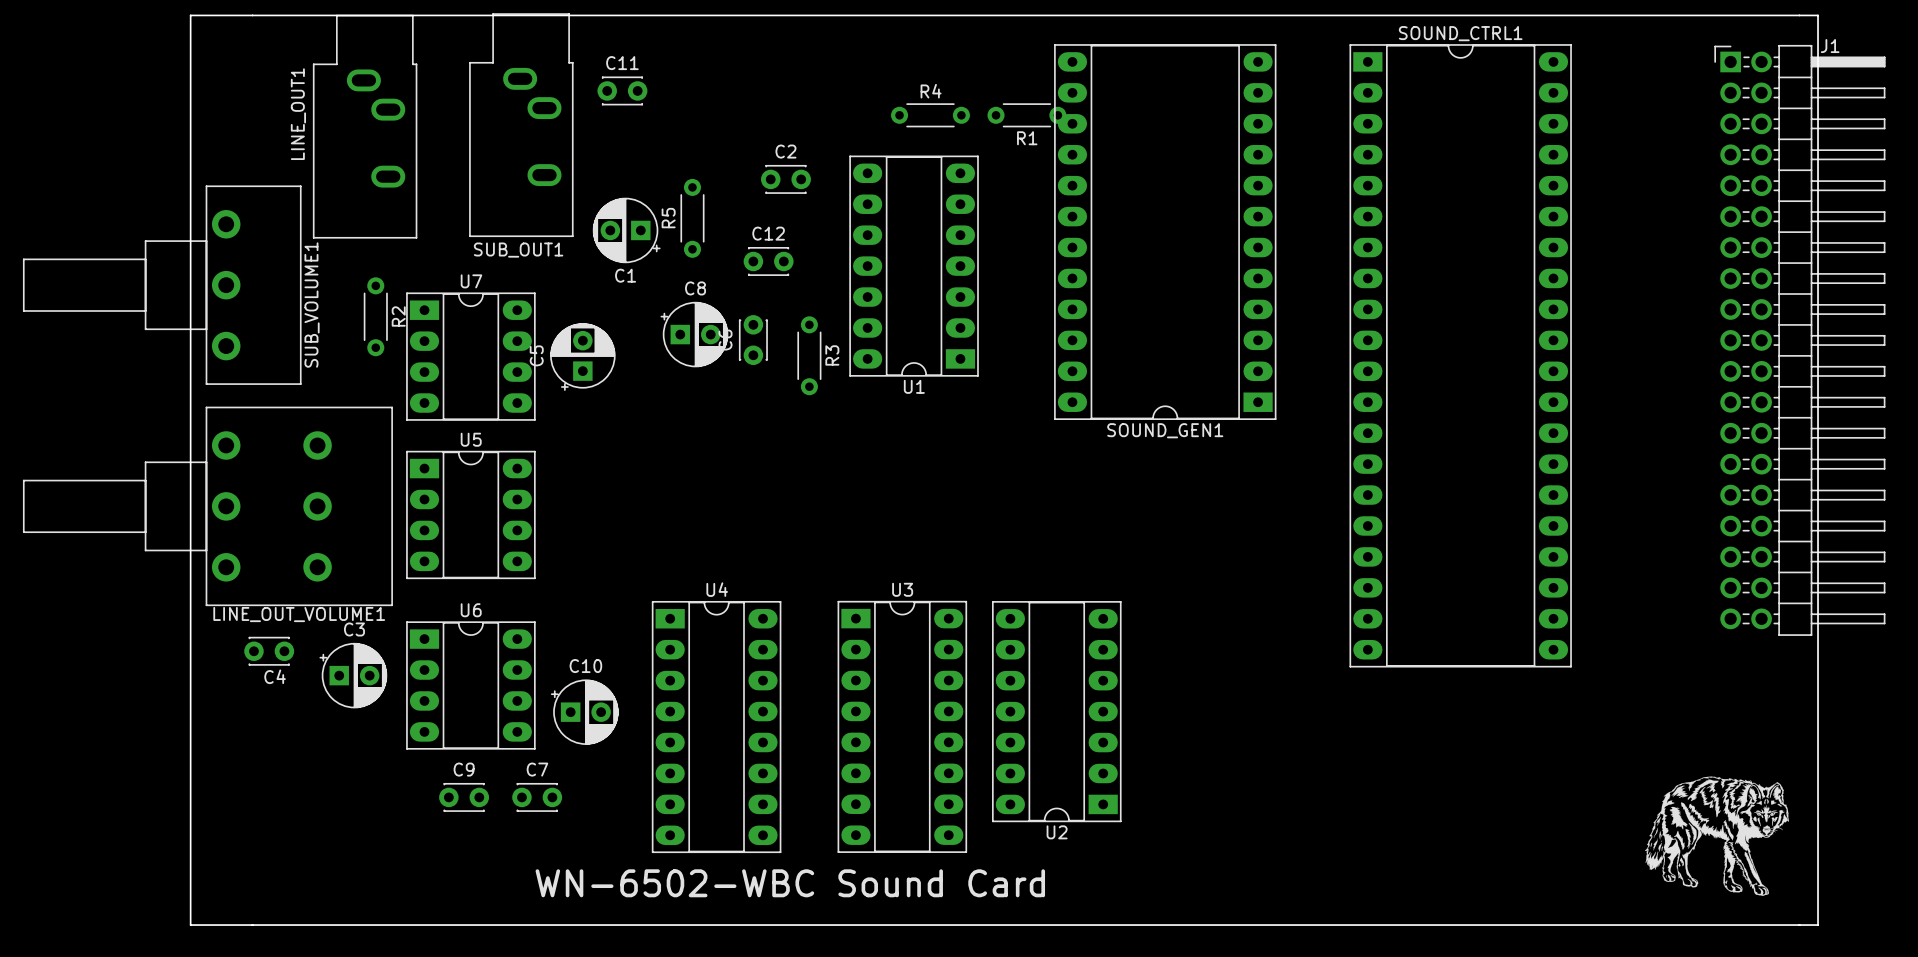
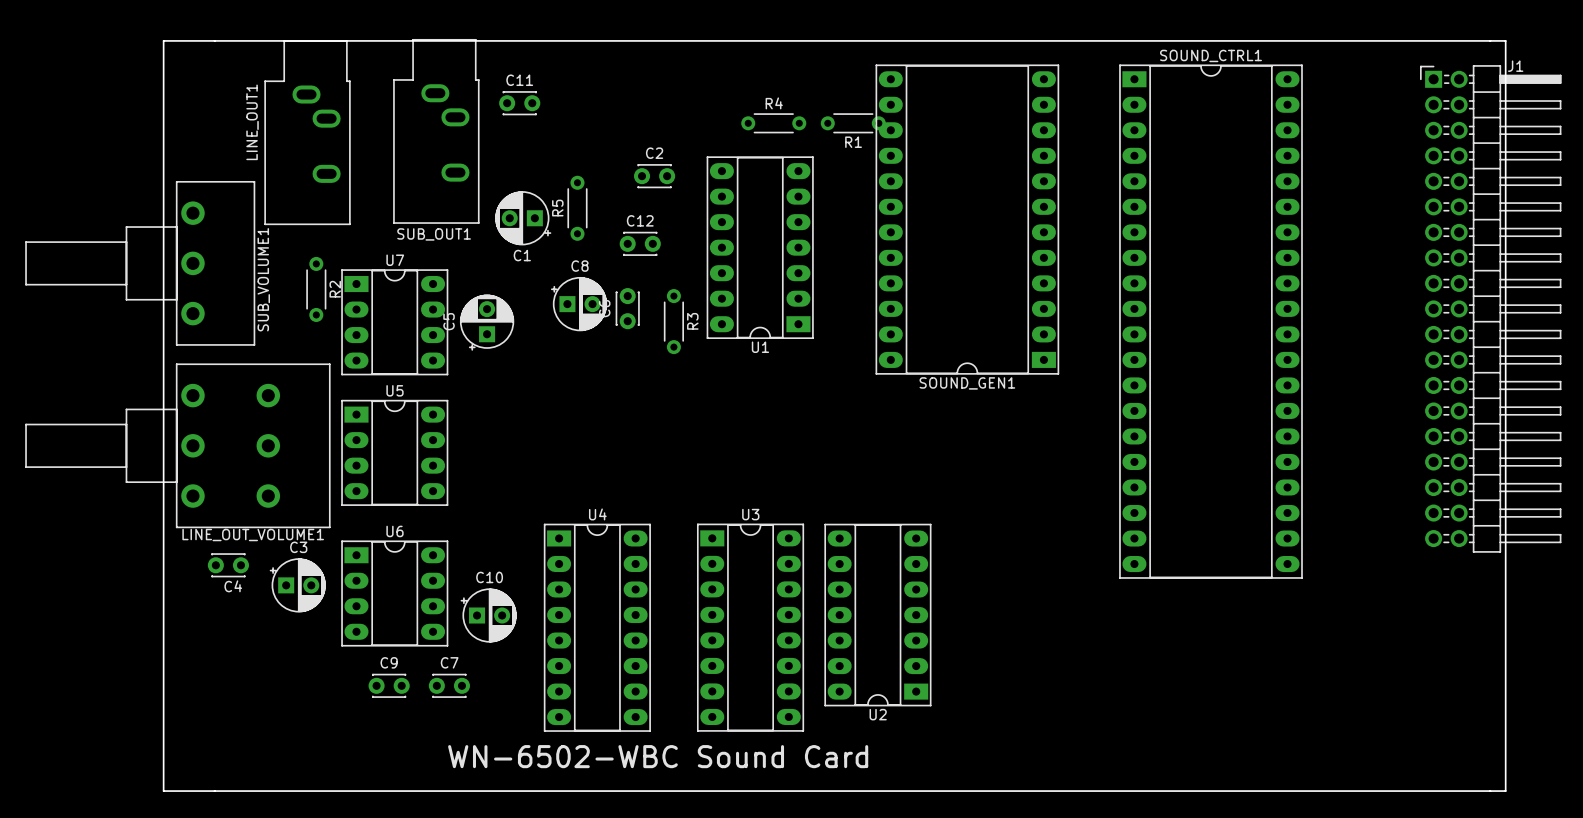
drawing: [1644, 776, 1790, 896] -> none

